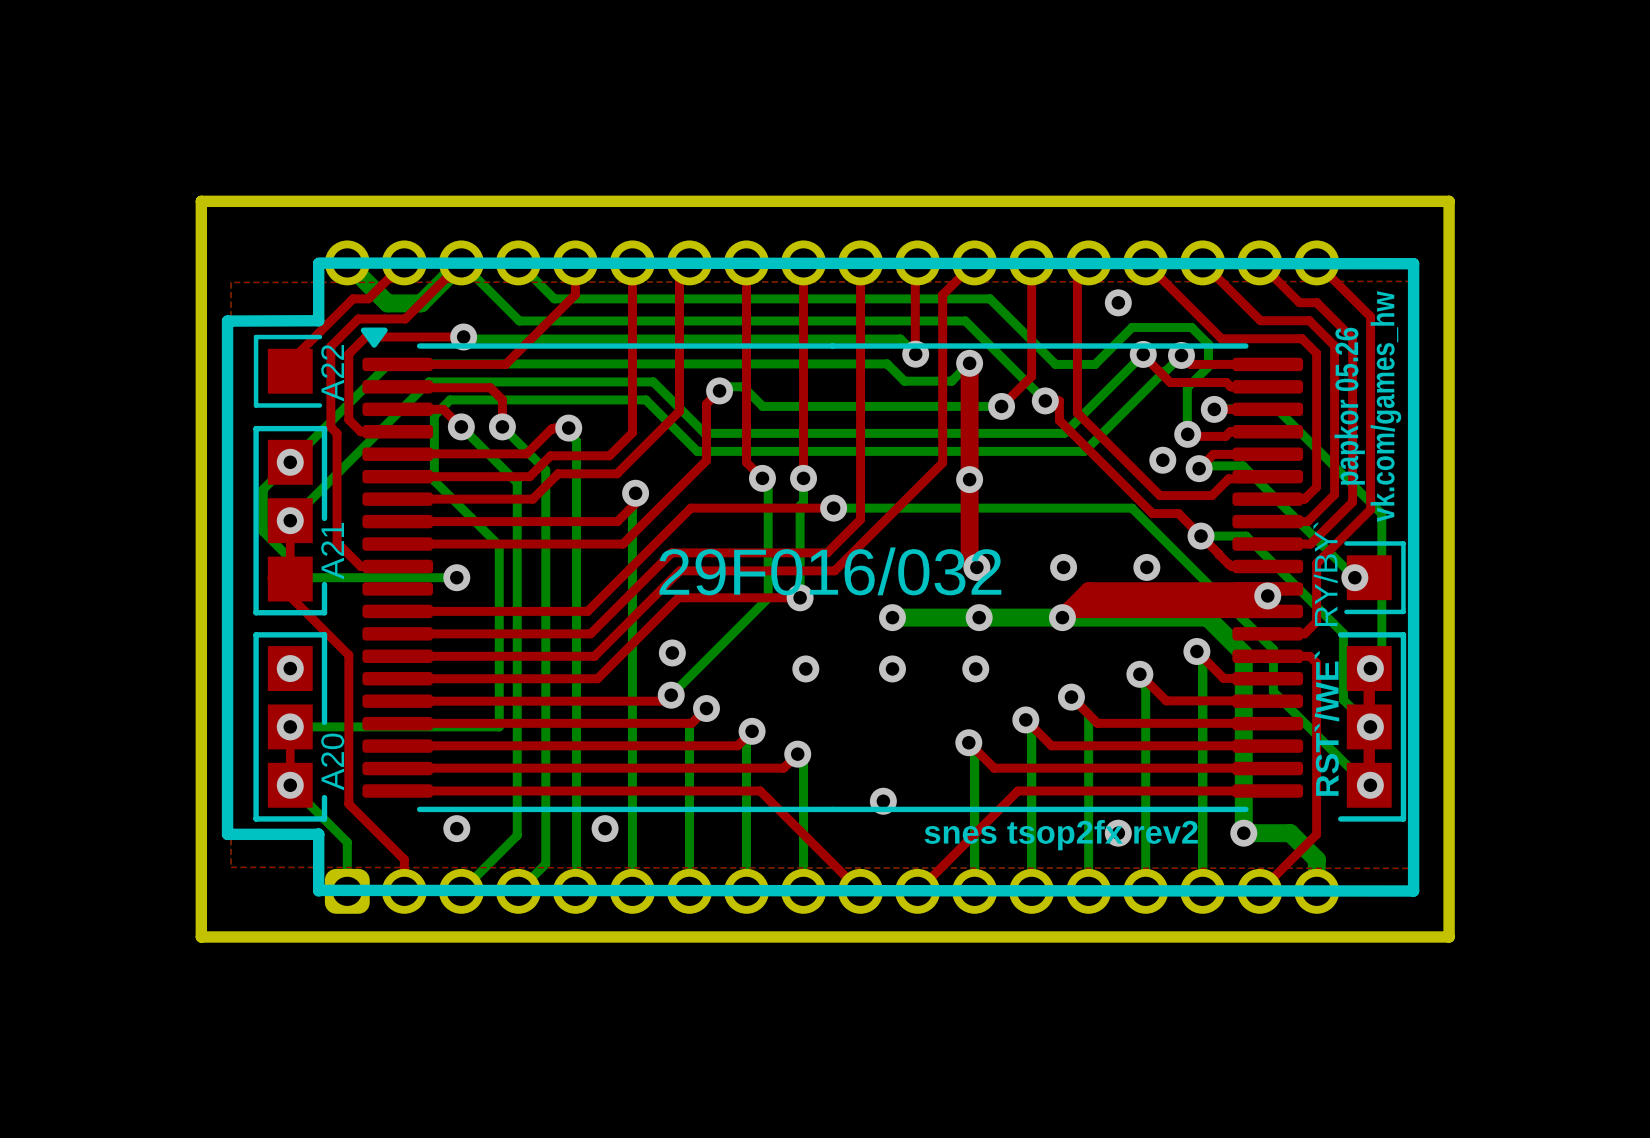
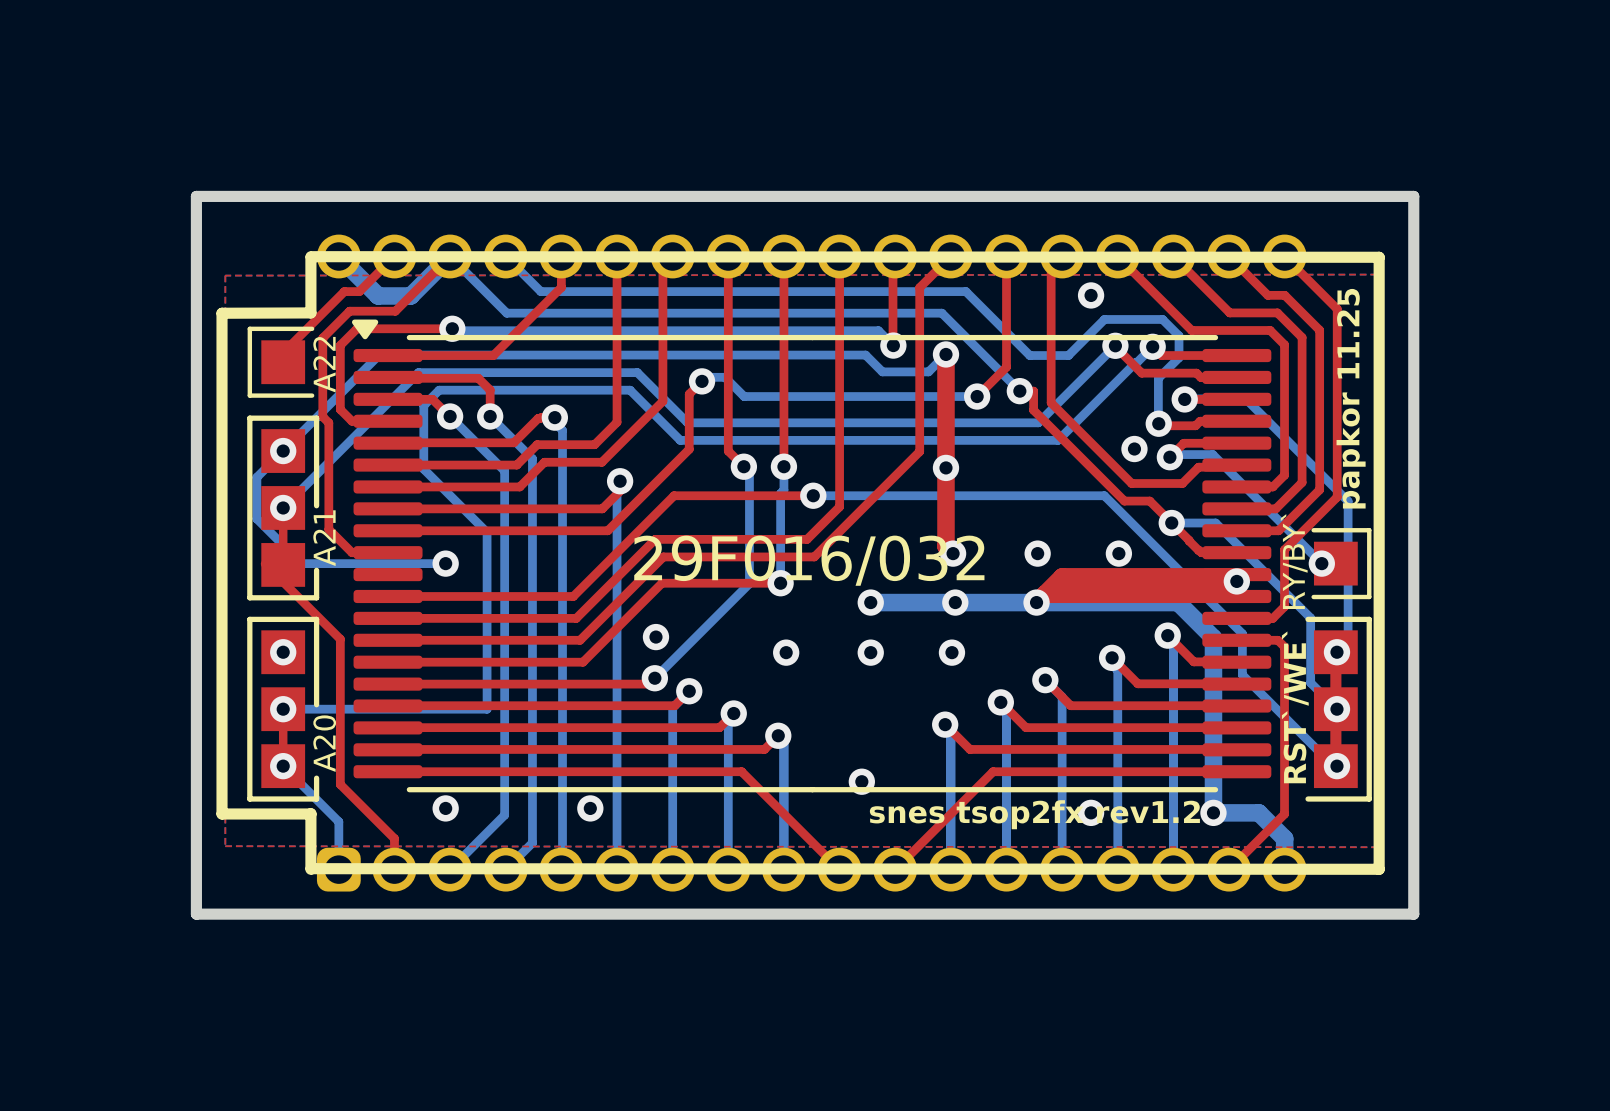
text: papkor 05.26 (1349, 406) -> none
text: vk.com/games_hw (1385, 406) -> papkor 11.25 (1351, 398)
text: snes tsop2fx rev2 (1061, 835) -> snes tsop2fx rev1.2 (1034, 814)

